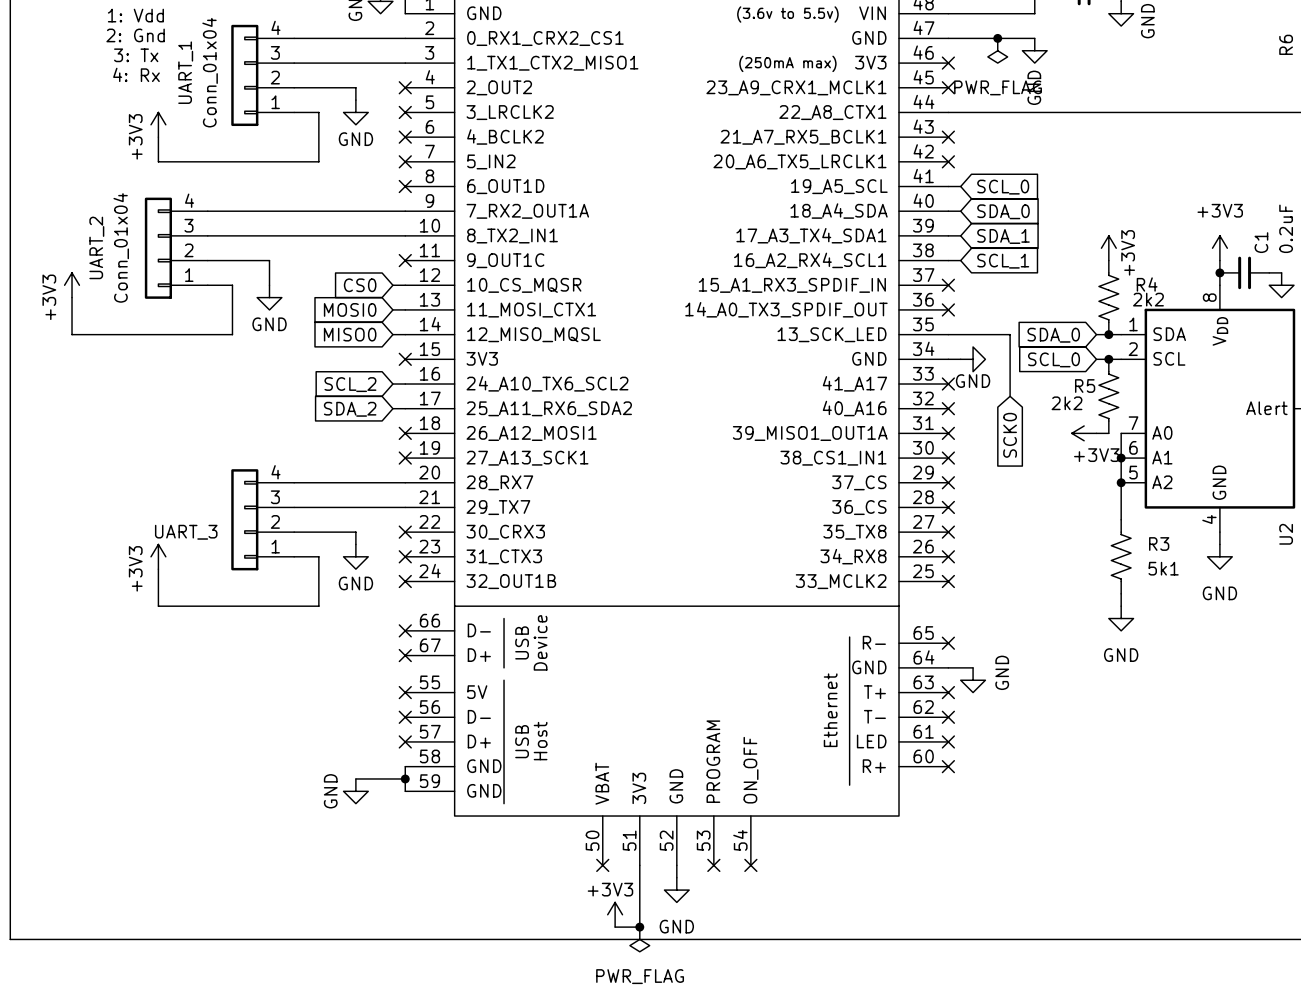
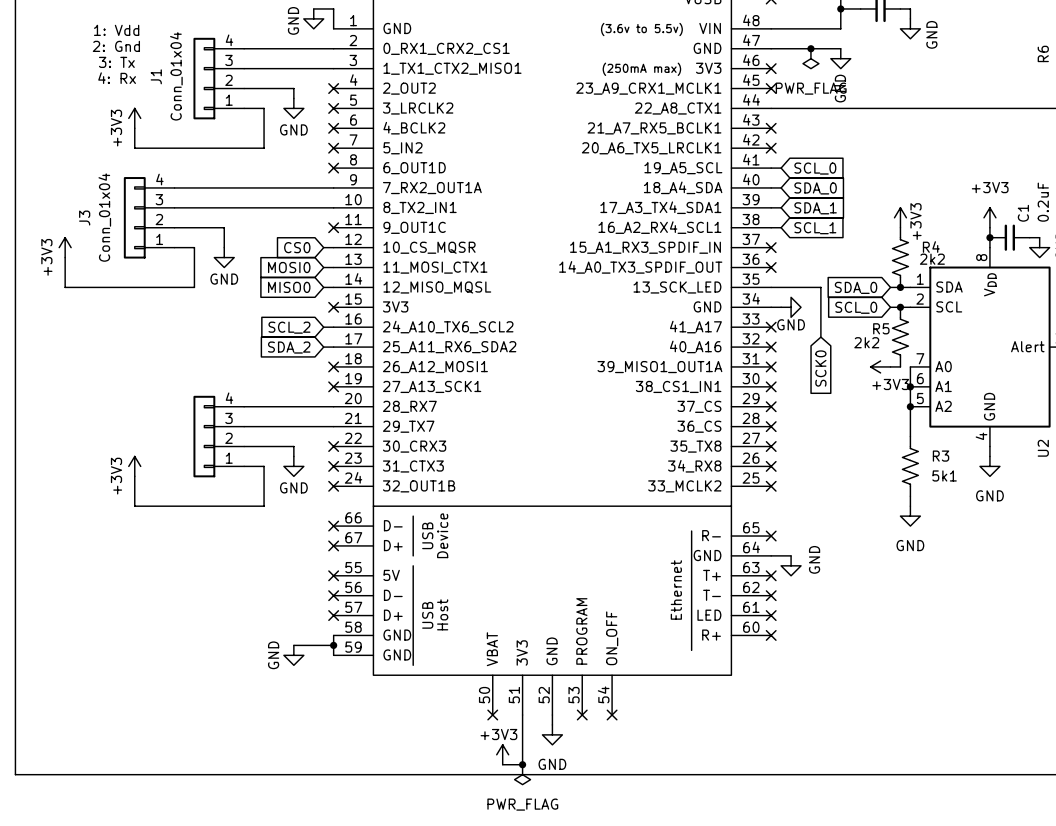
UART_1 name: UART_1 (185, 72) -> J1 (156, 76)
UART_2 name: UART_2 (96, 247) -> J3 (84, 218)
UART_3 name: UART_3 (186, 532) -> none

